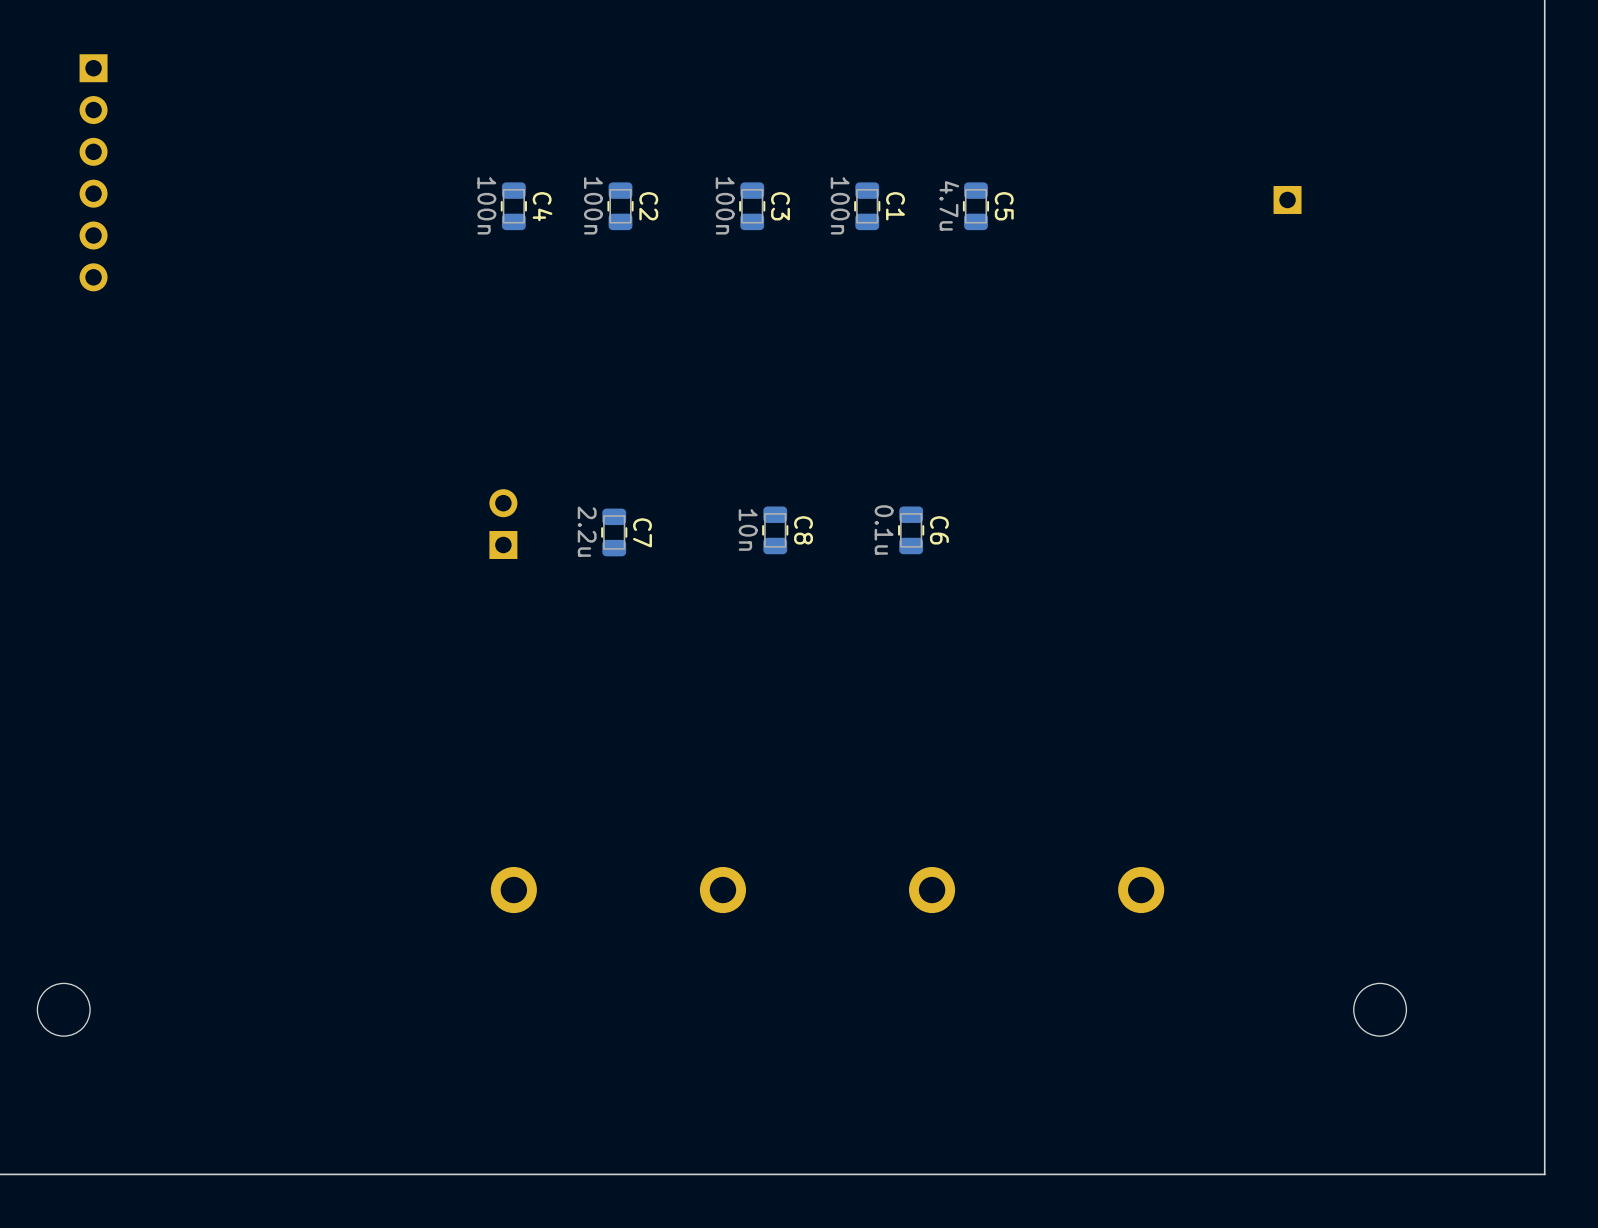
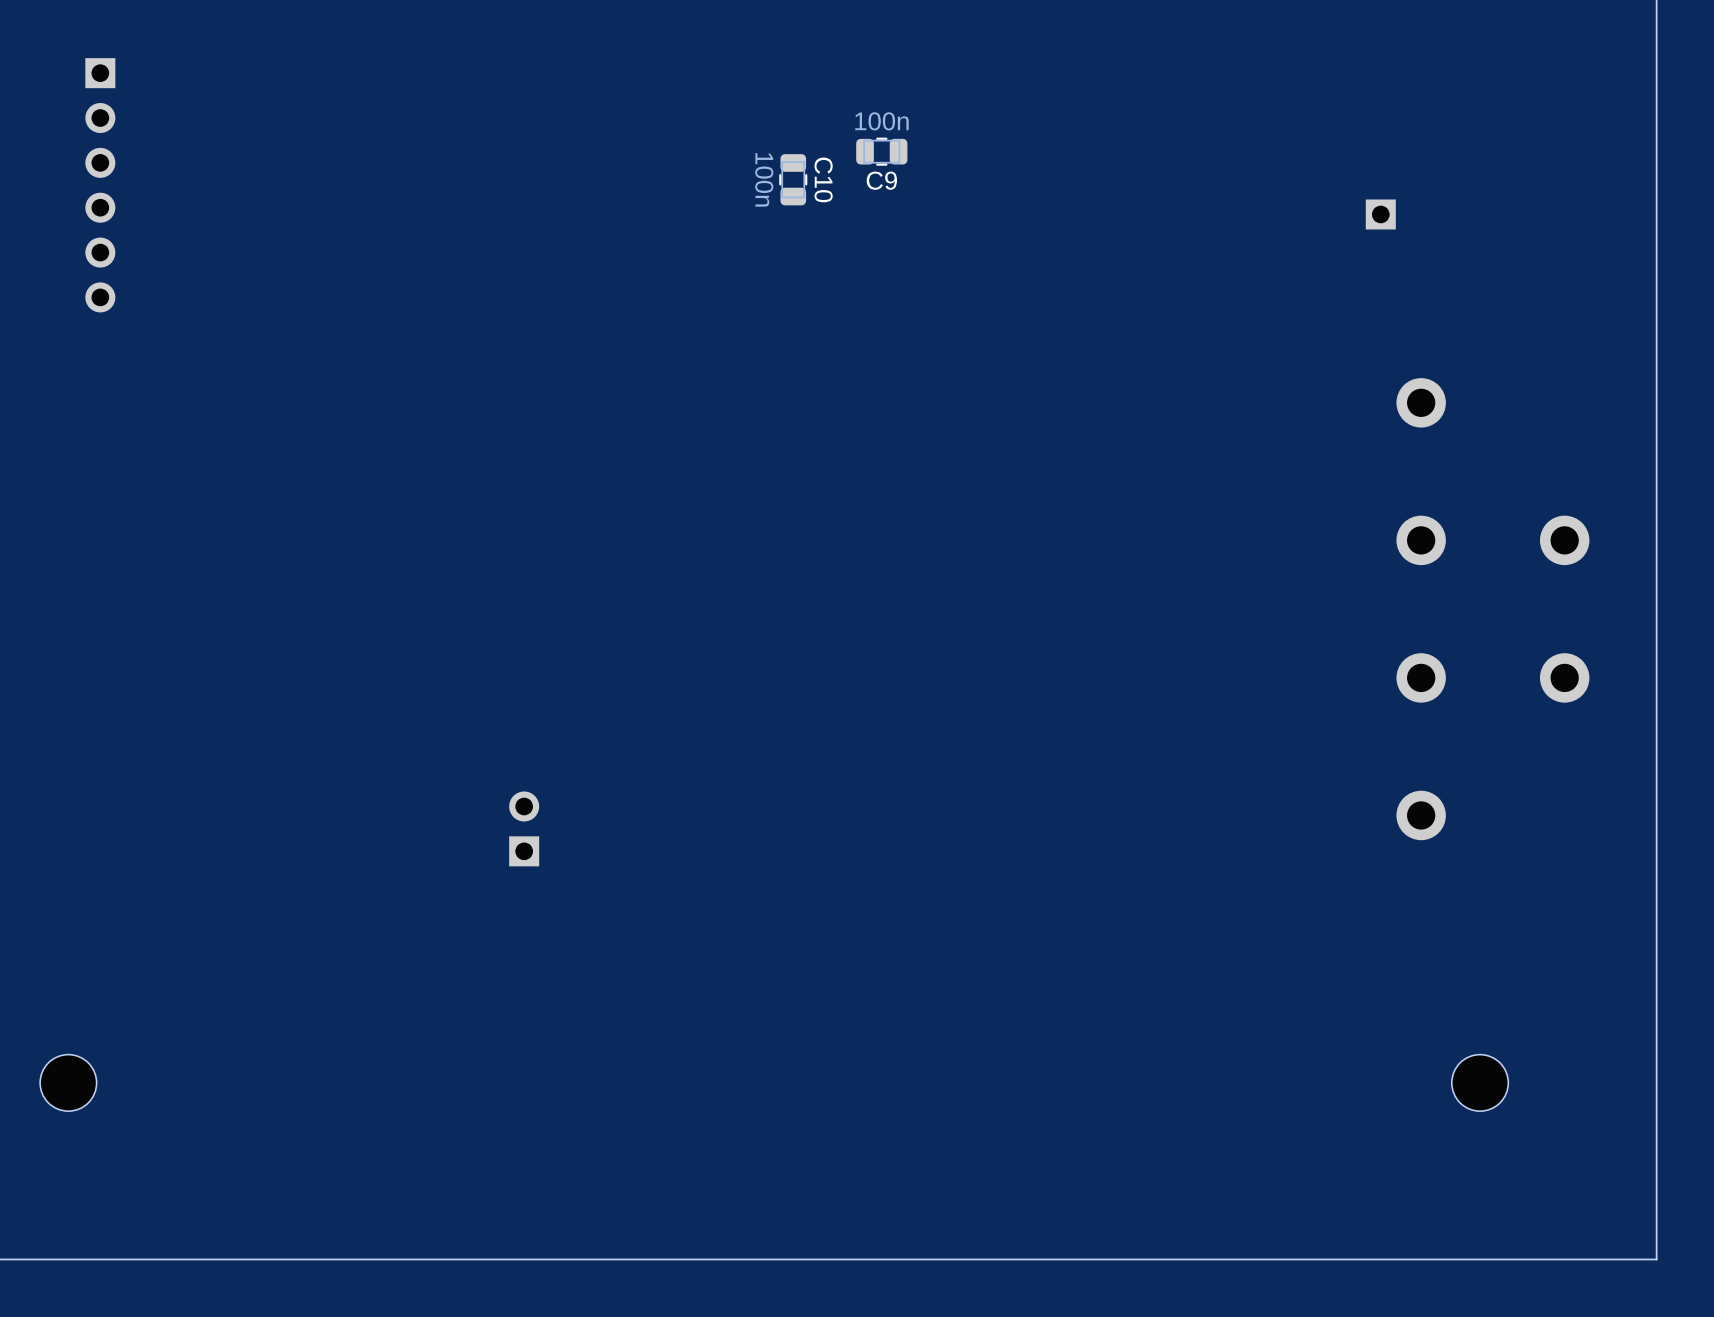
C9: none -> 100n (881, 151)
C10: none -> 100n (793, 179)
C4: 100n (513, 206) -> none
C2: 100n (620, 206) -> none
C3: 100n (752, 206) -> none
C1: 100n (867, 206) -> none
C5: 4.7u (975, 206) -> none
part: none -> (1421, 402)
part: none -> (1421, 540)
part: none -> (1564, 540)
part position: (503, 524) -> (524, 828)
C8: 10n (775, 530) -> none
C6: 0.1u (911, 530) -> none
C7: 2.2u (614, 532) -> none
part: none -> (1421, 677)
part: none -> (1564, 677)
part: none -> (1421, 815)
part: (513, 890) -> none
part: (722, 890) -> none
part: (932, 890) -> none
part: (1141, 890) -> none

